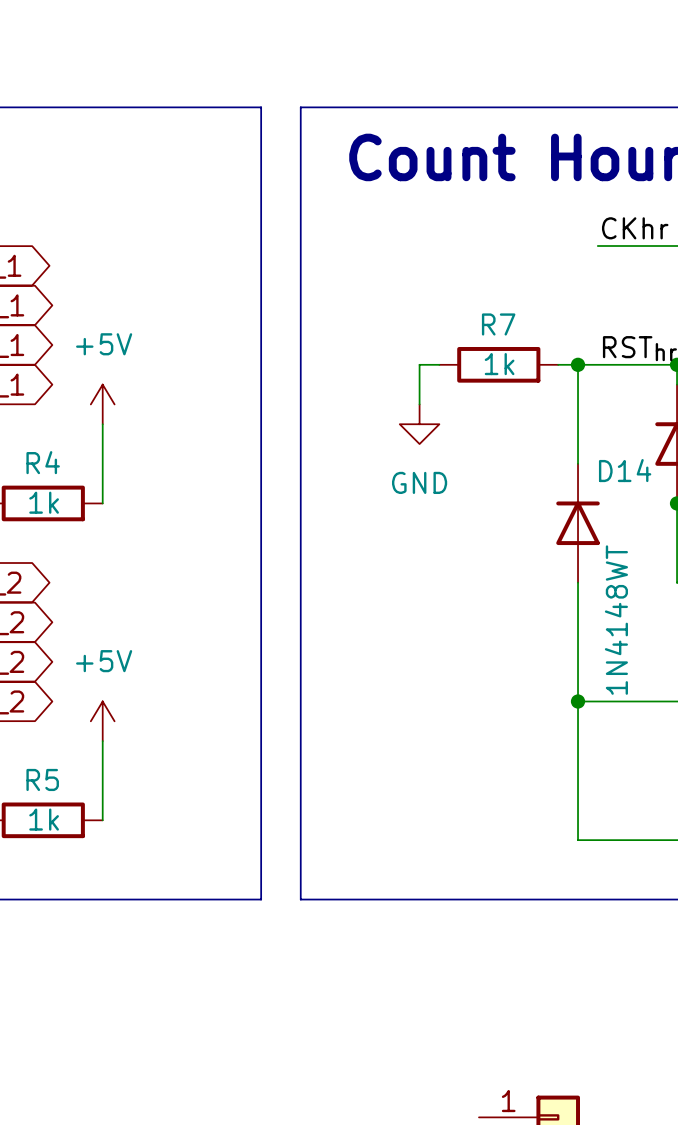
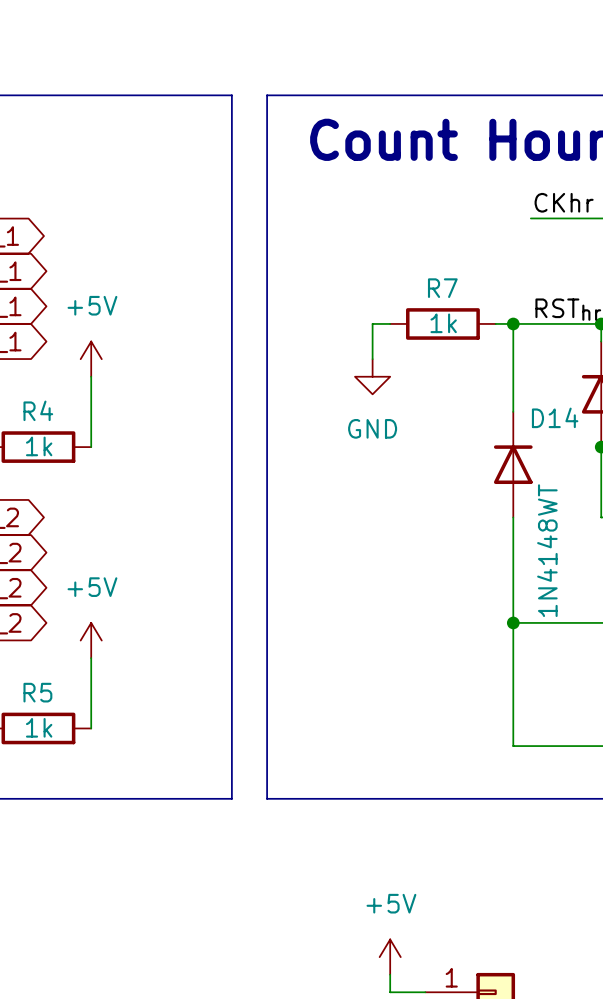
power symbol: none -> +5V (390, 957)
wire: none -> (390, 974) (390, 992) (425, 992)

